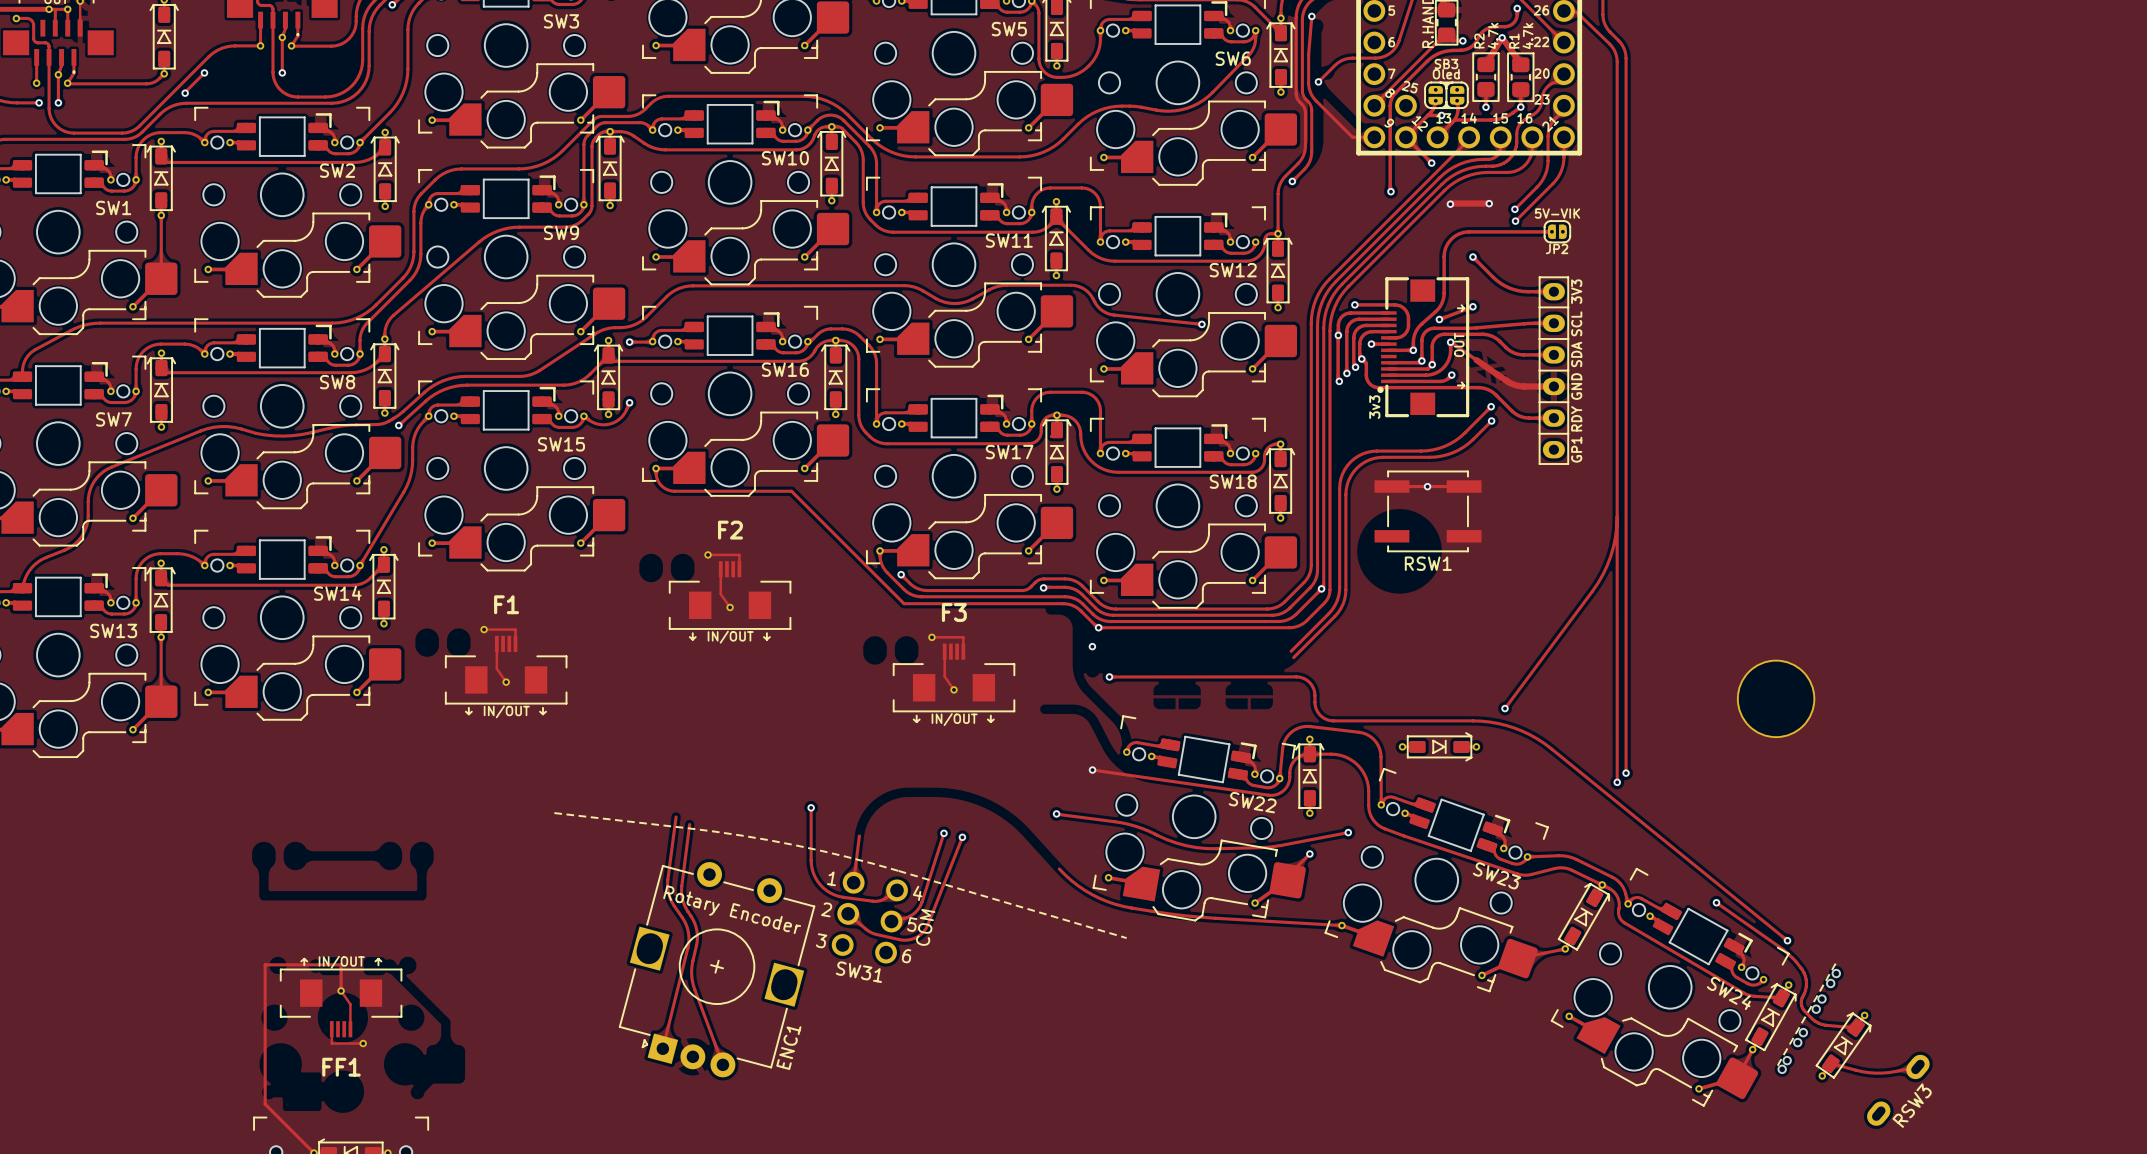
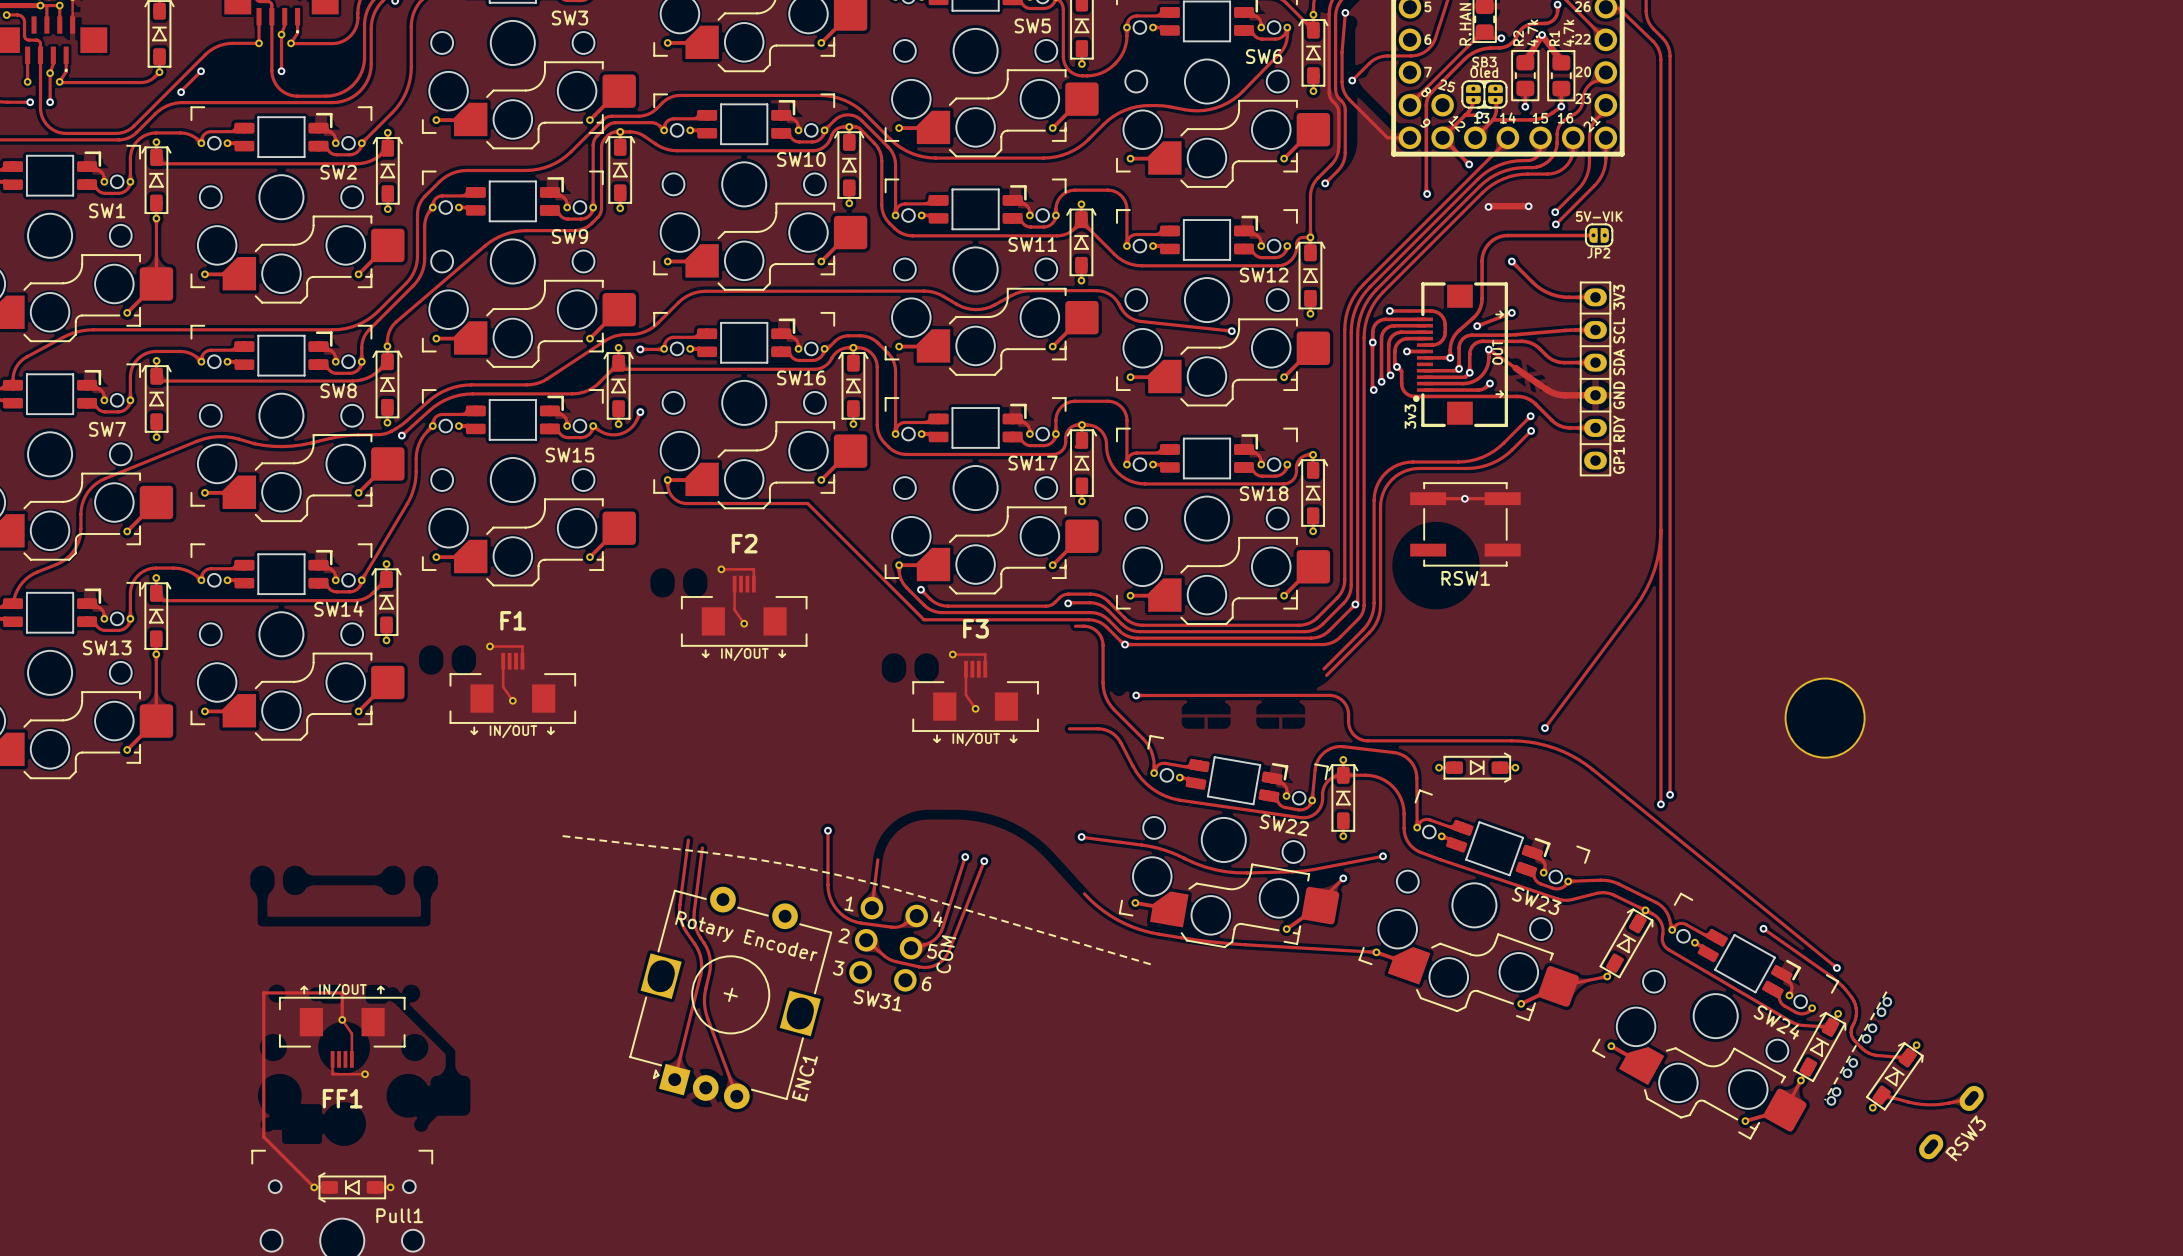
track: none -> (1075, 626) (1091, 627) (1100, 635) (1102, 642) (1103, 682) (1105, 697) (1114, 709) (1147, 744) (1153, 758) (1154, 773)
via: (1092, 646) -> none
track: (1092, 770) (1268, 795) -> (1069, 728) (1100, 728) (1113, 734) (1119, 740) (1141, 778) (1152, 788) (1165, 796) (1179, 800) (1300, 817)
via: (1092, 770) -> none

